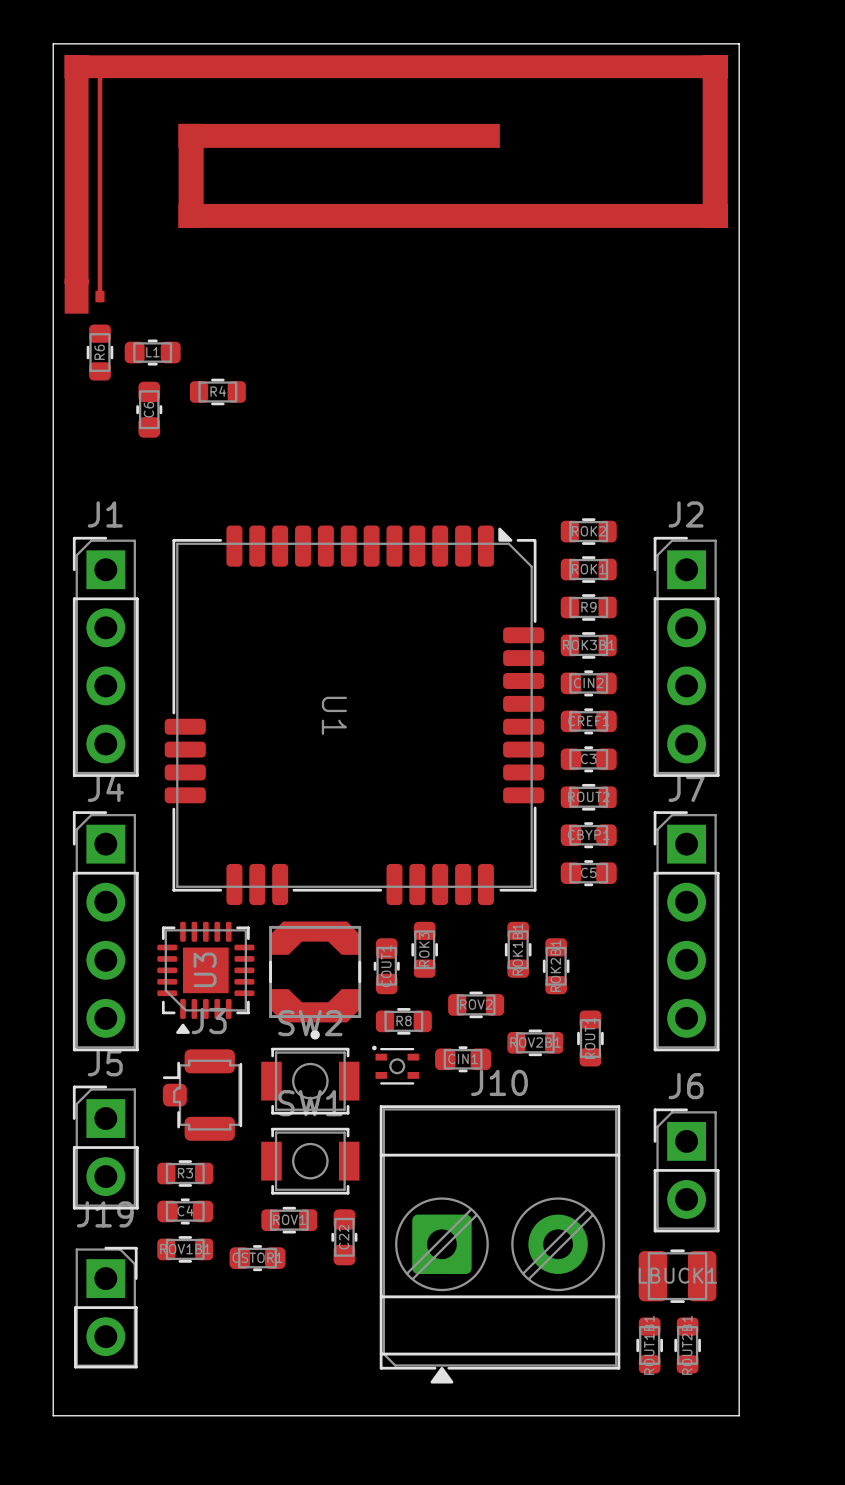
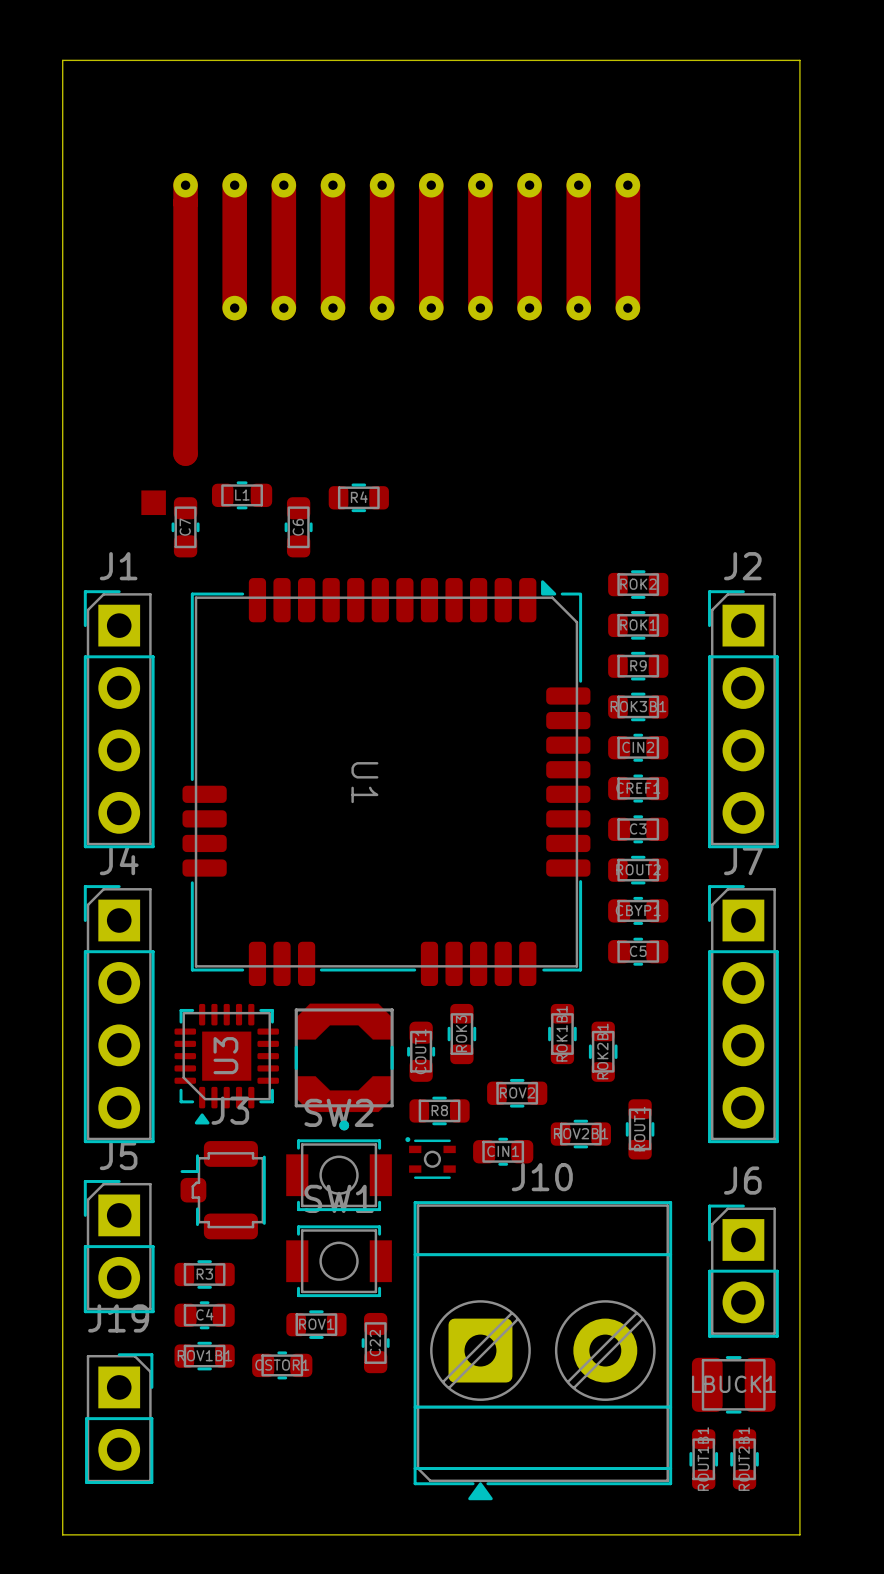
part: (396, 184) -> none
part: none -> (390, 343)
R6: (99, 352) -> none
L1 position: (152, 352) -> (242, 495)
R4 position: (217, 391) -> (358, 497)
C6 position: (149, 409) -> (298, 527)
C7: none -> (185, 527)

